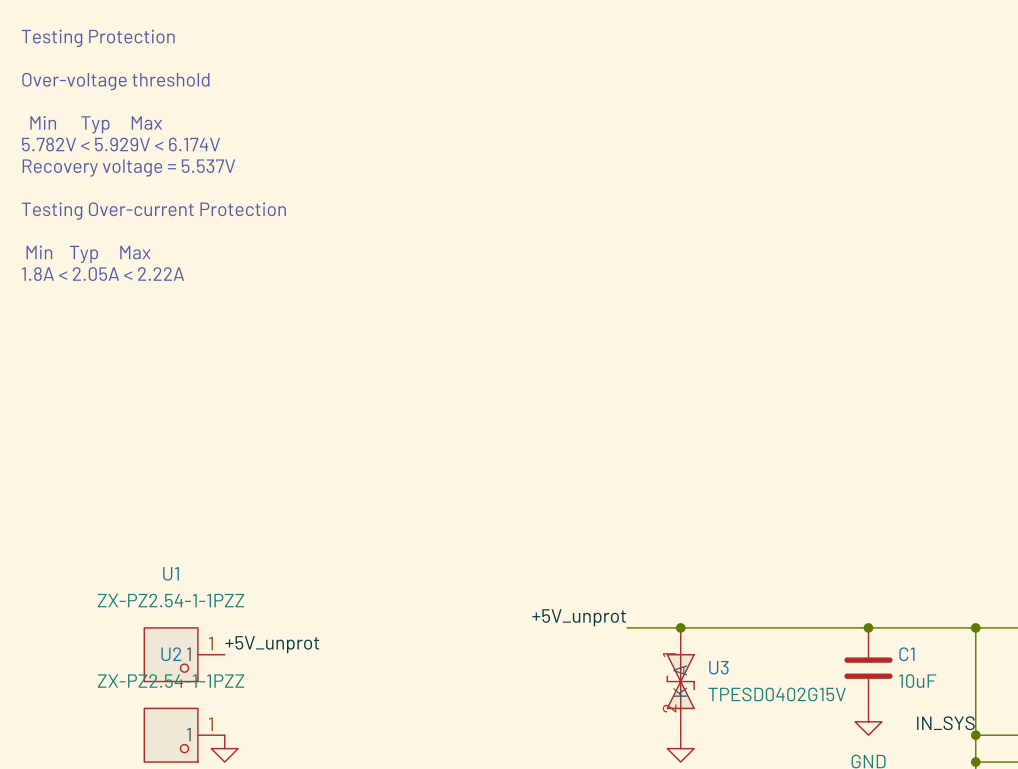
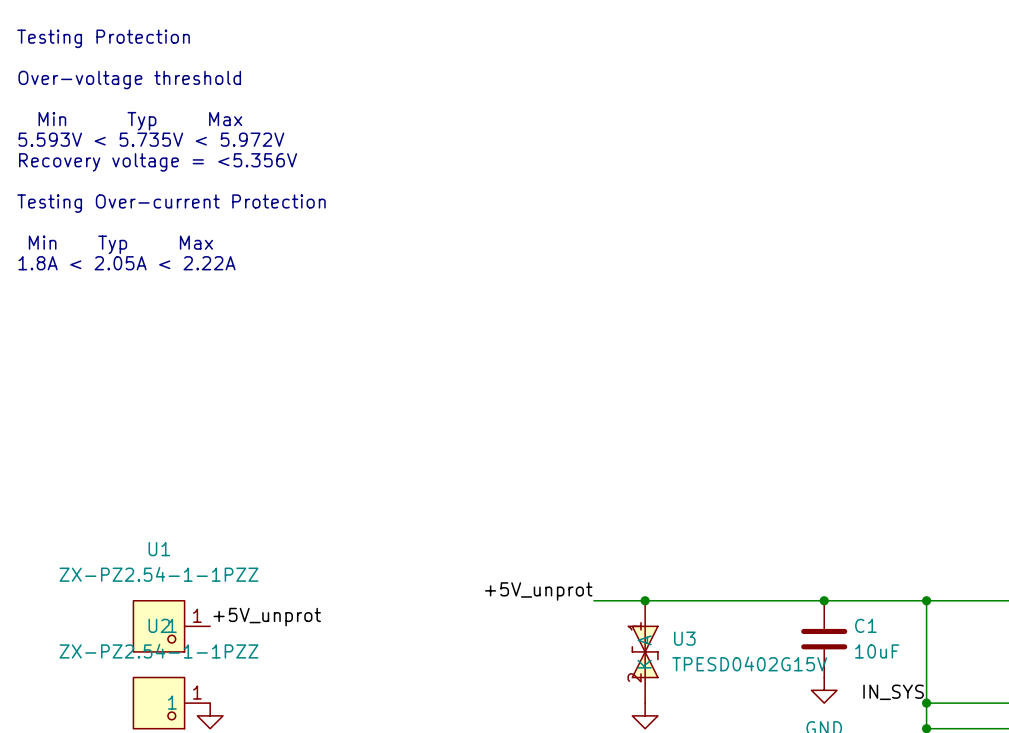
text: 5.782V < 5.929V < 6.174V (121, 144) -> 5.593V < 5.735V < 5.972V (151, 139)
text: Recovery voltage = 5.537V (128, 168) -> Recovery voltage = <5.356V (158, 162)

